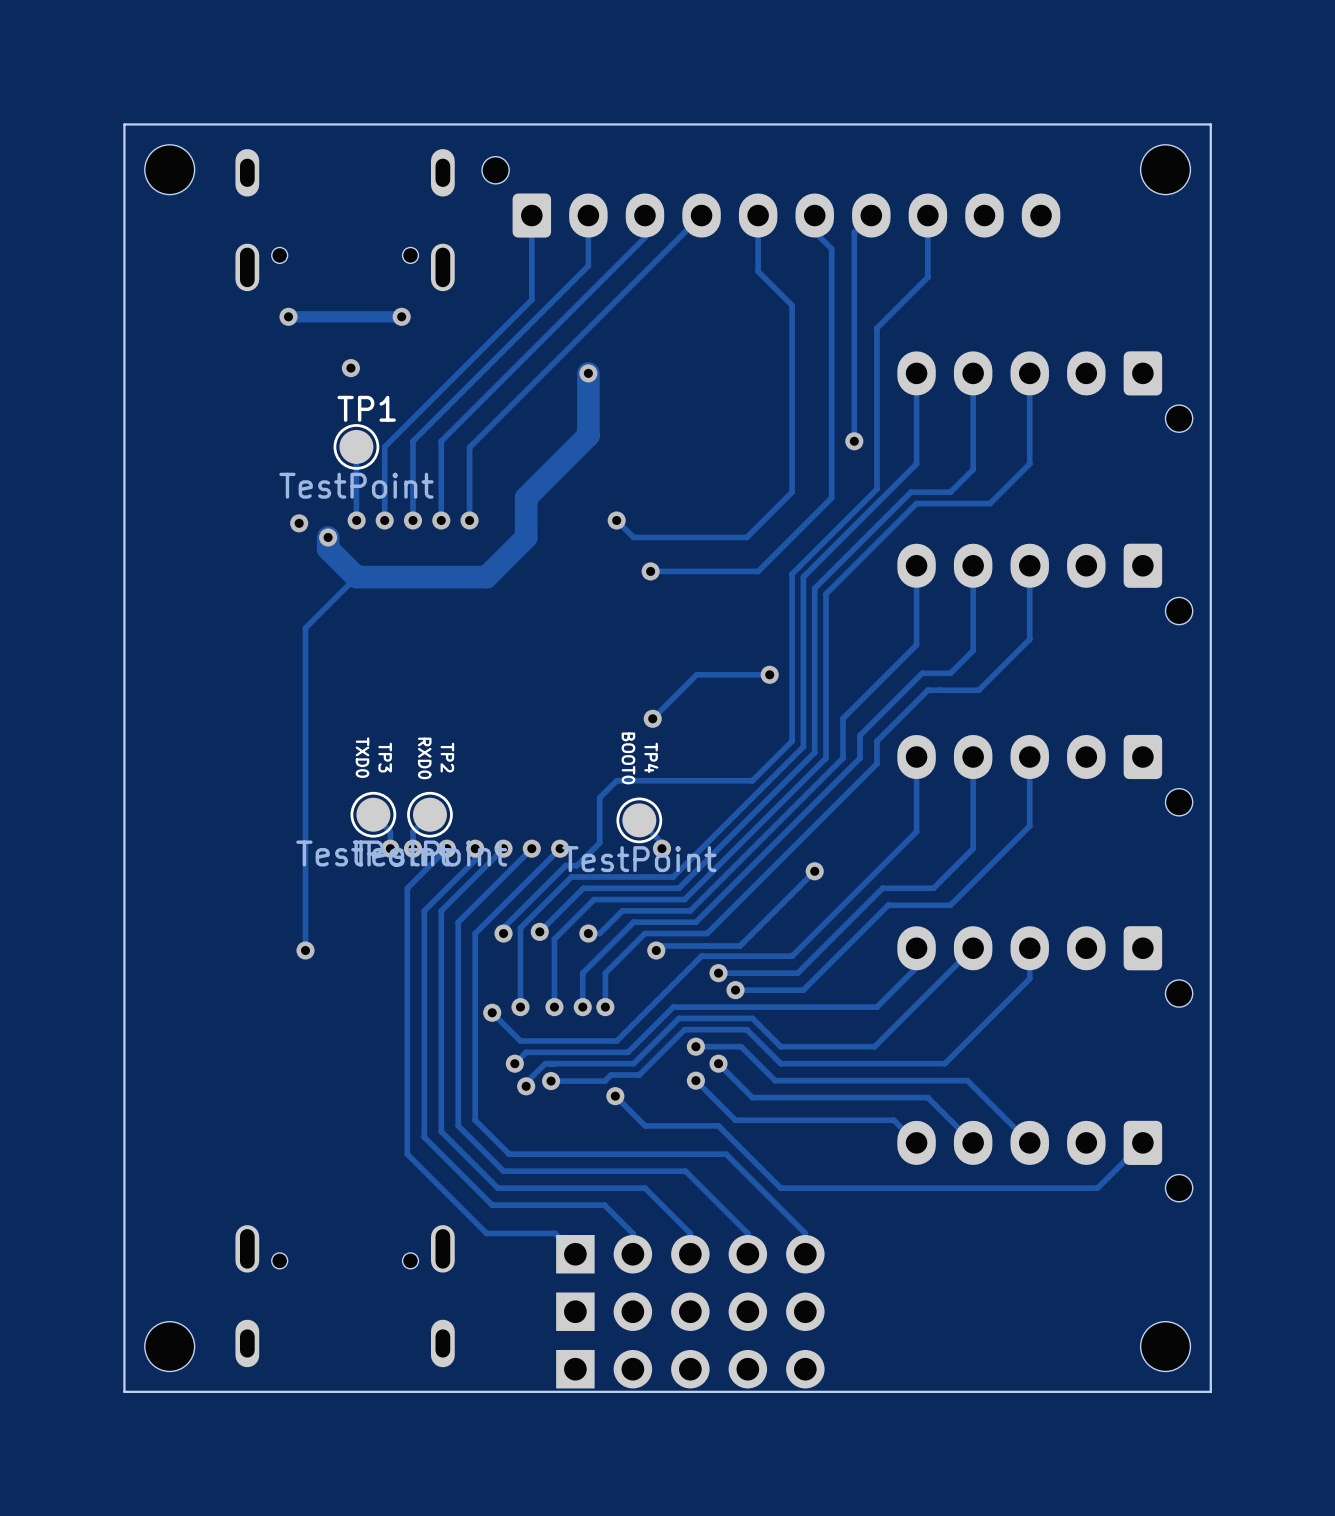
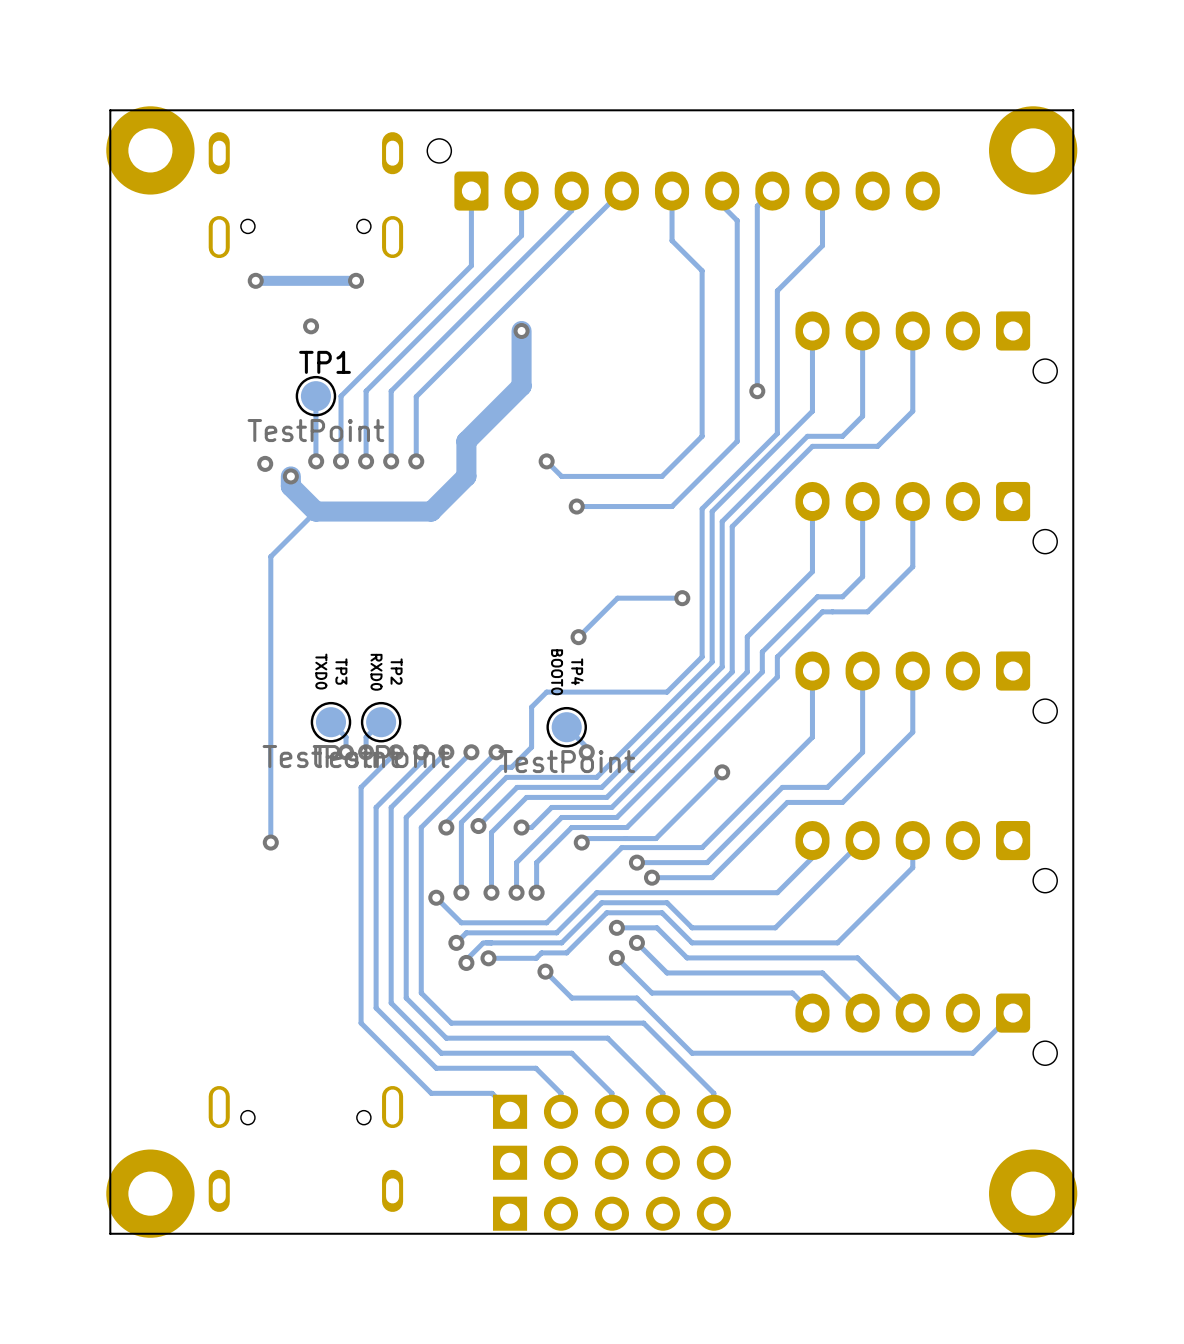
part footprint: [144, 144, 195, 195] -> [106, 106, 195, 195]
part footprint: [1140, 144, 1191, 195] -> [989, 106, 1078, 195]
part footprint: [144, 1321, 195, 1372] -> [106, 1149, 195, 1238]
part footprint: [1140, 1321, 1191, 1372] -> [989, 1149, 1078, 1238]

